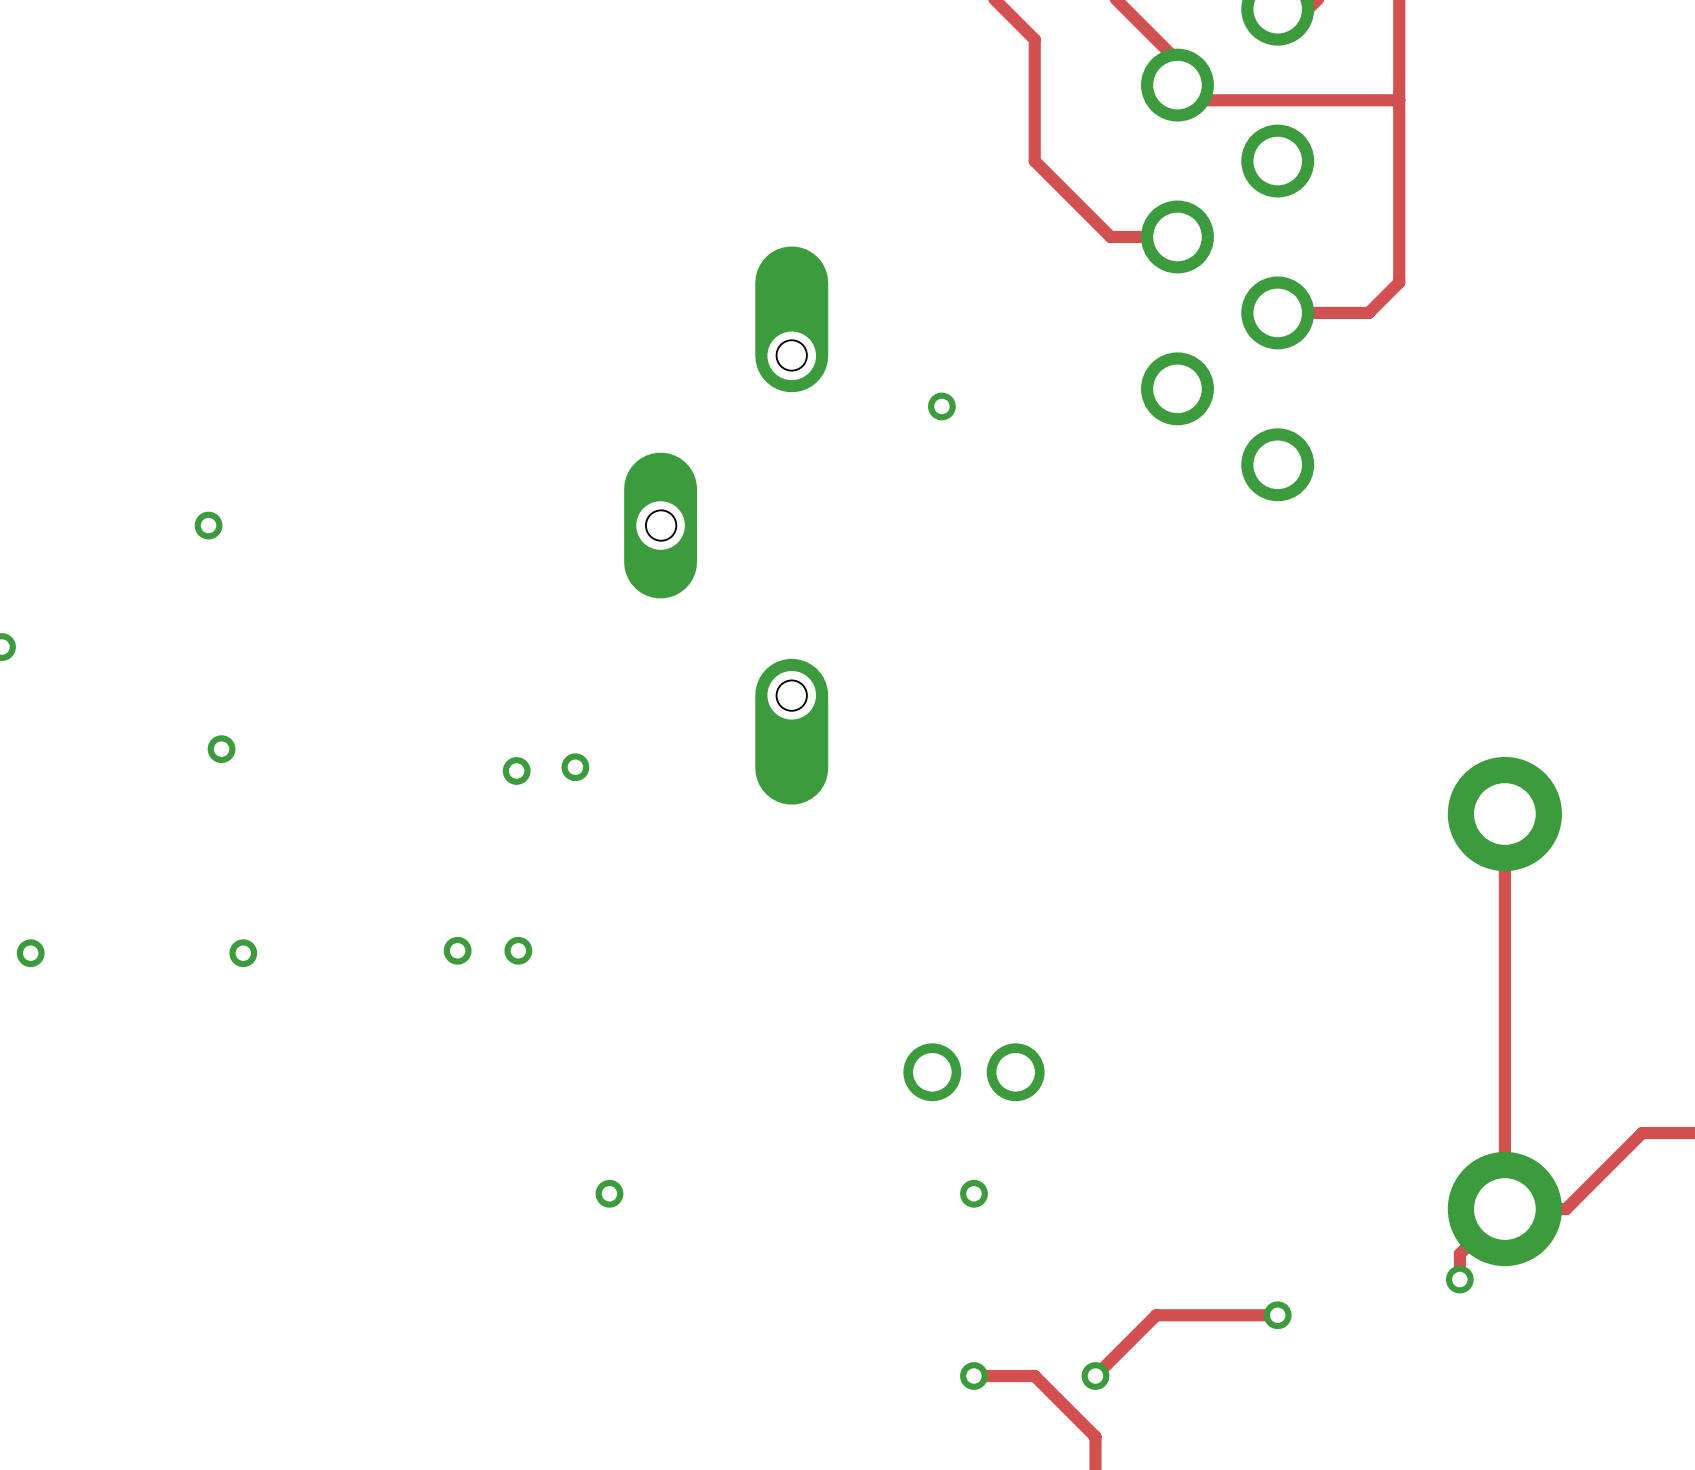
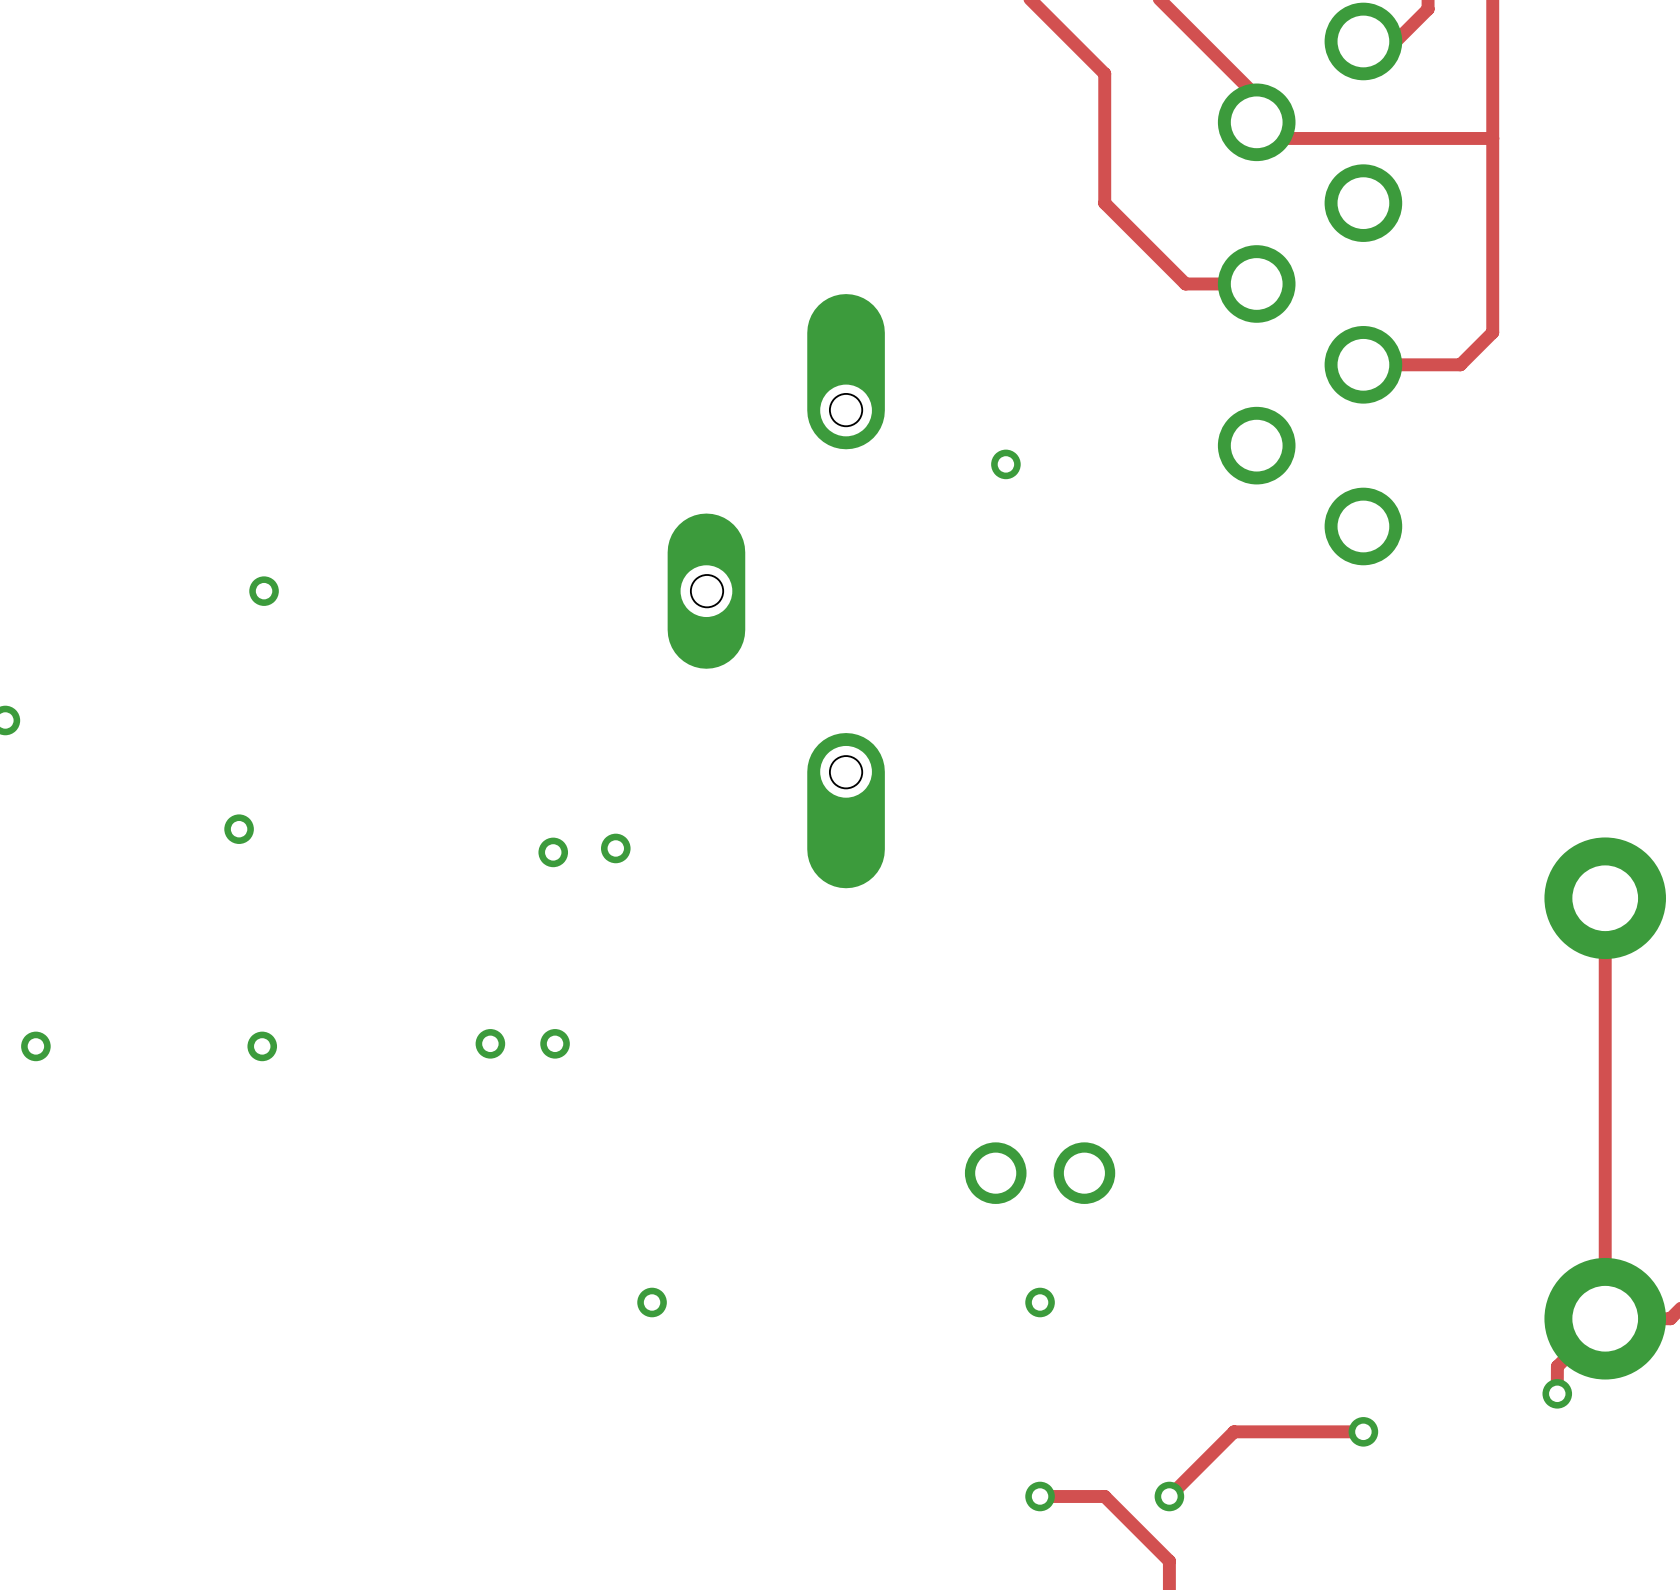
via position: (208, 525) -> (264, 591)

